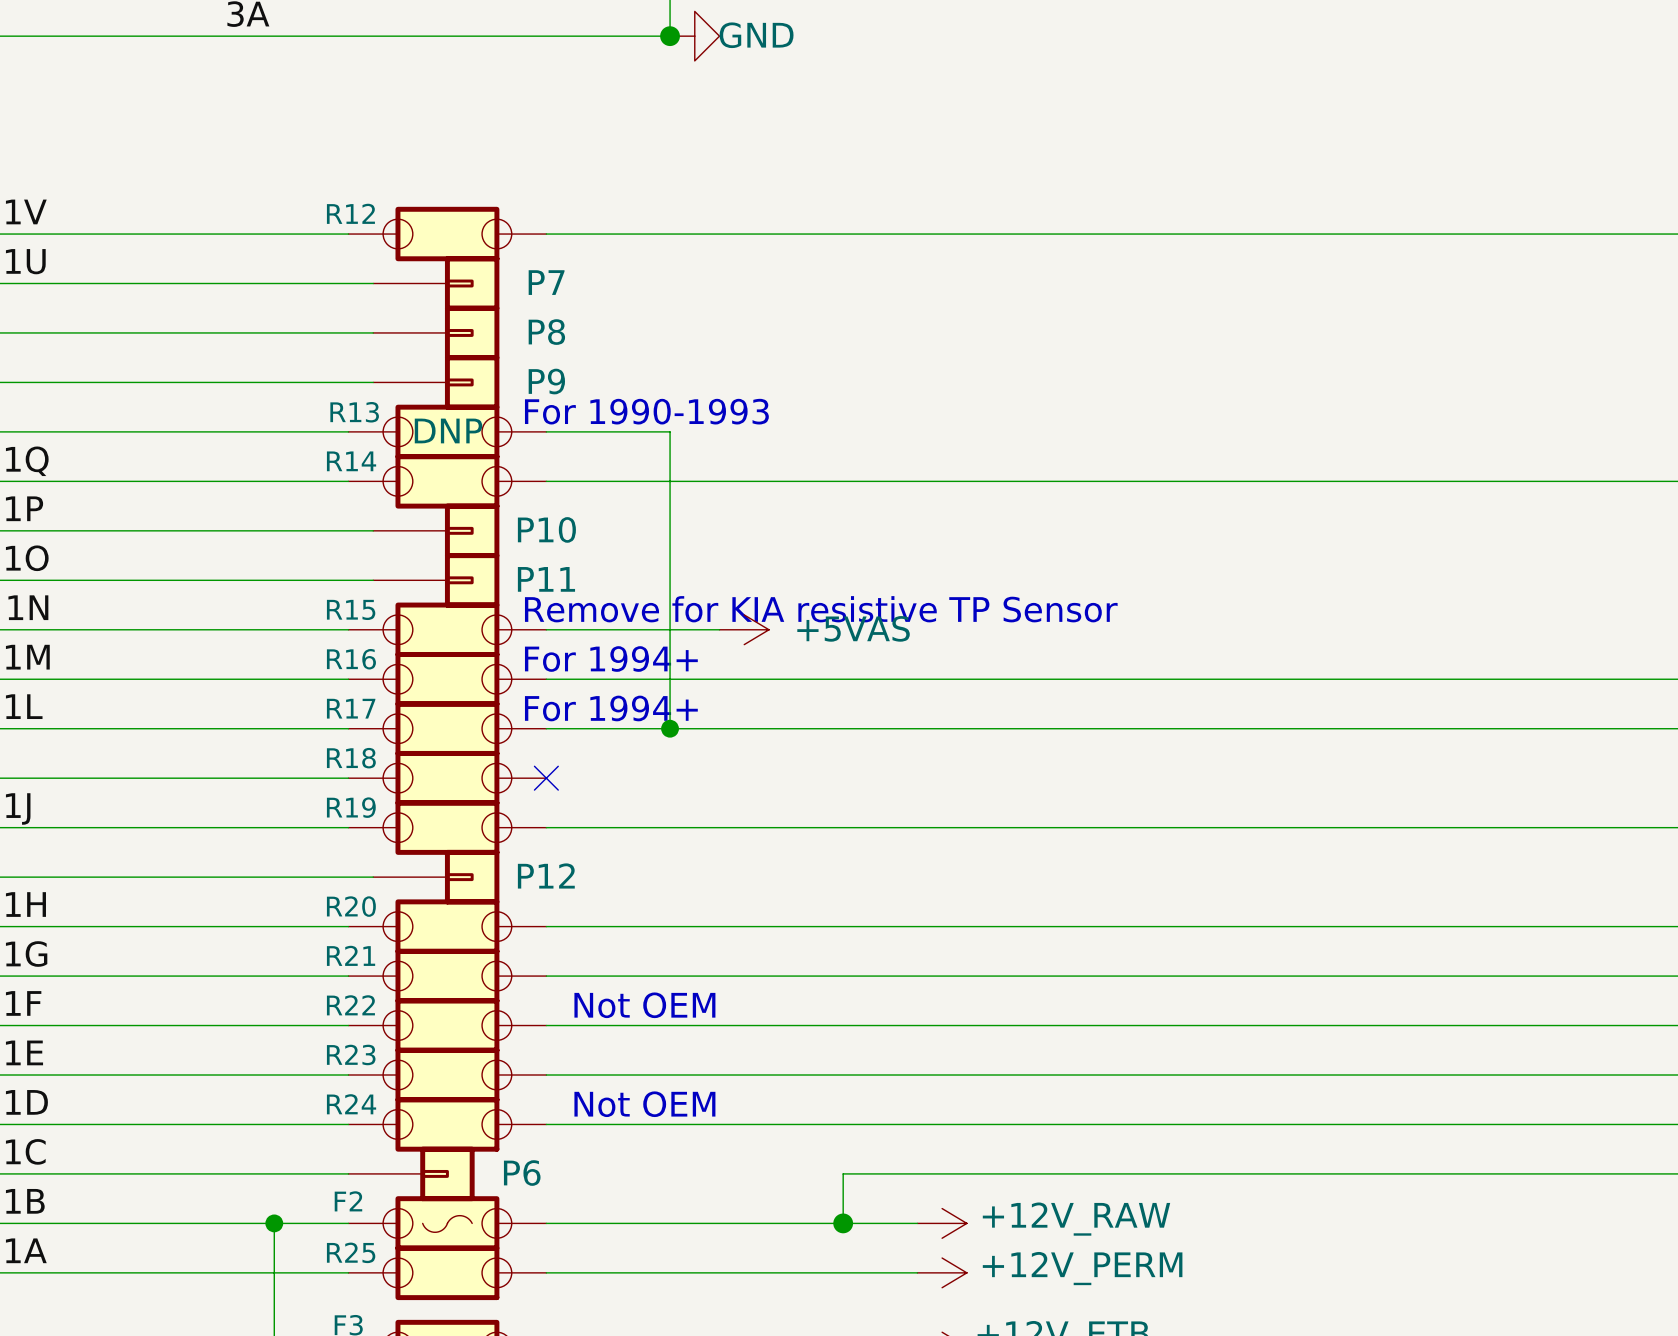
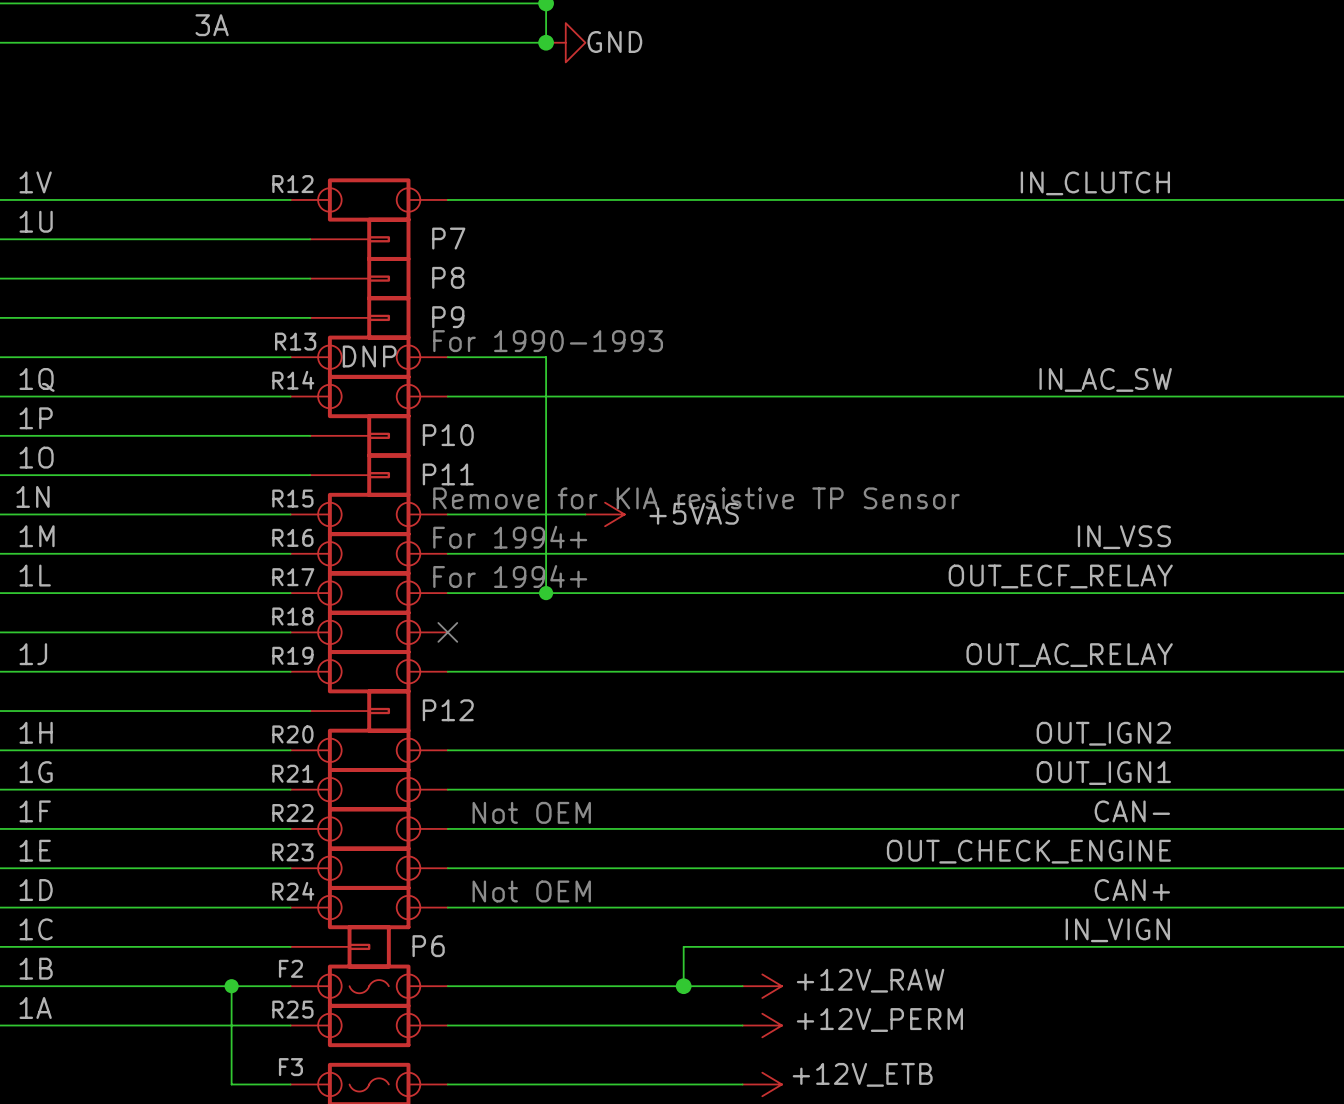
label: none -> IN_CLUTCH (1095, 183)
label: none -> IN_AC_SW (1105, 379)
label: none -> IN_VSS (1124, 537)
label: none -> OUT_ECF_RELAY (1060, 576)
label: none -> OUT_AC_RELAY (1069, 655)
label: none -> OUT_IGN2 (1103, 733)
label: none -> OUT_IGN1 (1103, 773)
label: none -> CAN- (1132, 811)
label: none -> OUT_CHECK_ENGINE (1028, 851)
label: none -> CAN+ (1132, 890)
label: none -> IN_VIGN (1117, 930)

